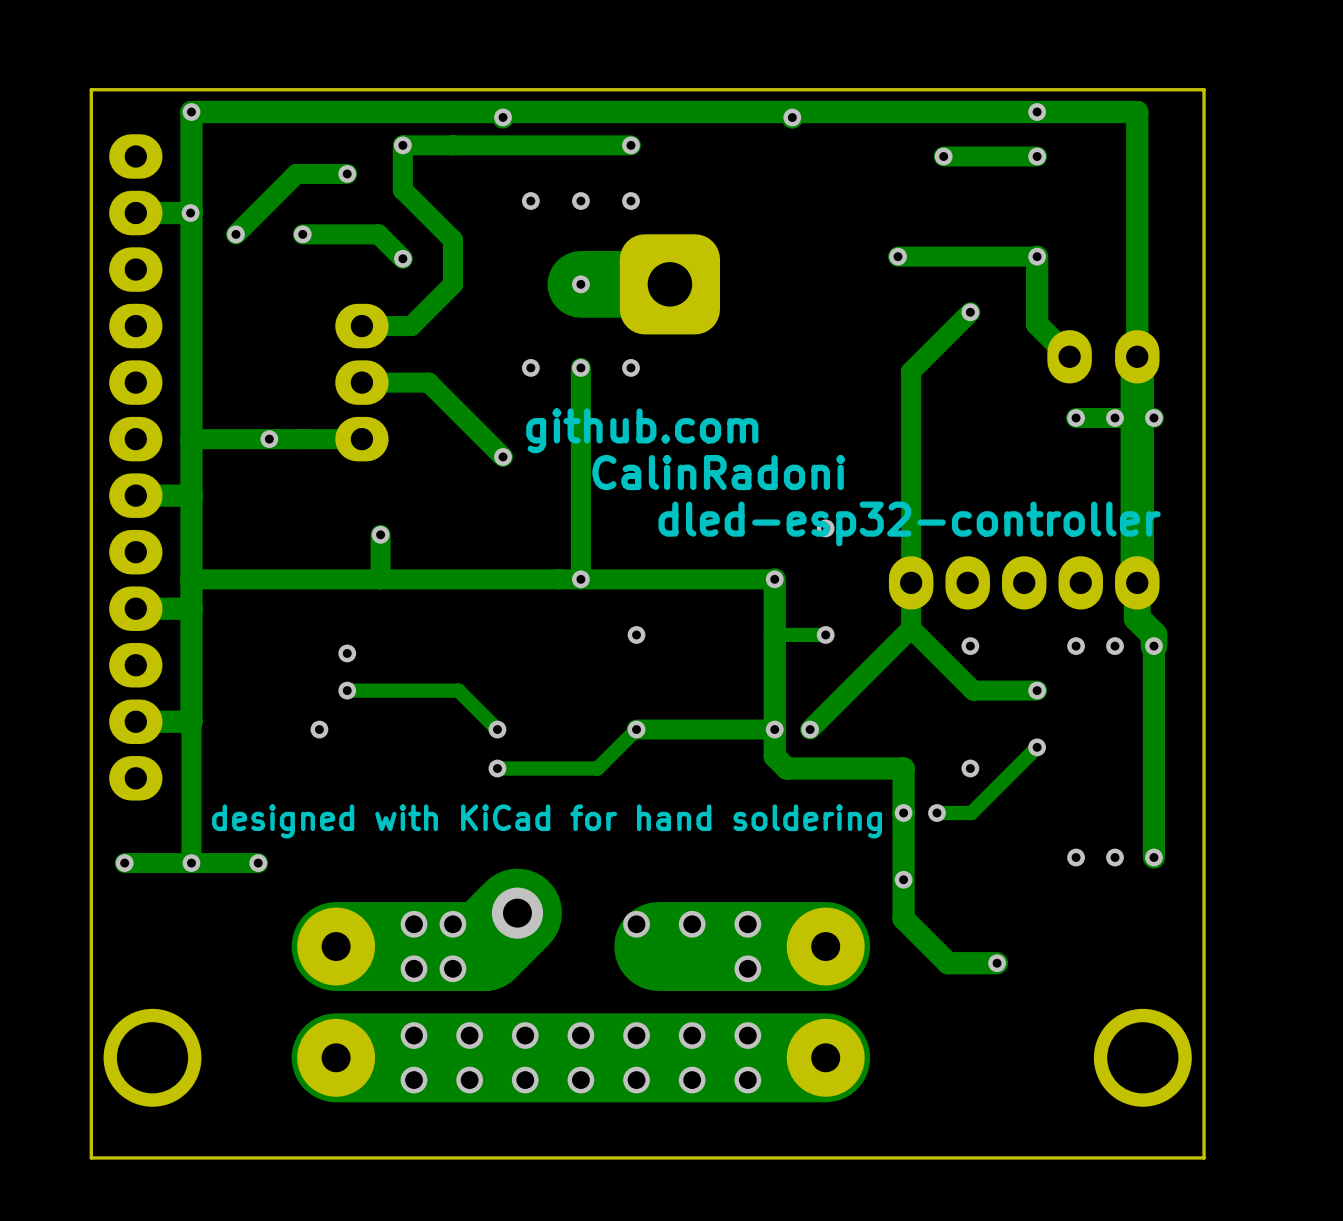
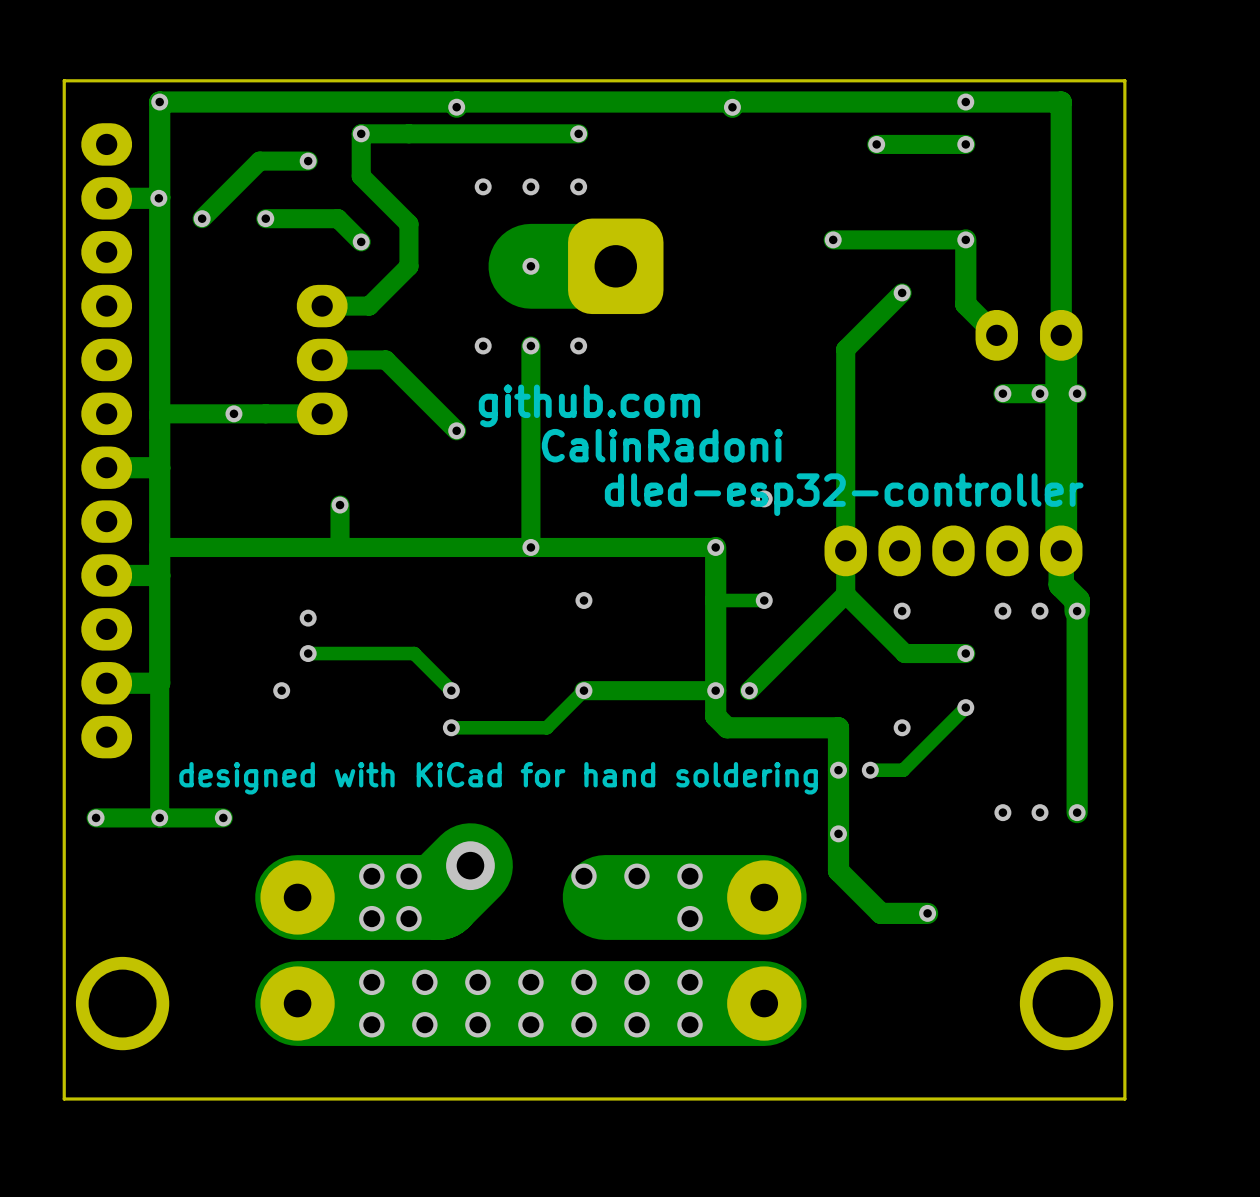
track width: thin (669, 284) (580, 284) -> thick (615, 266) (530, 266)

